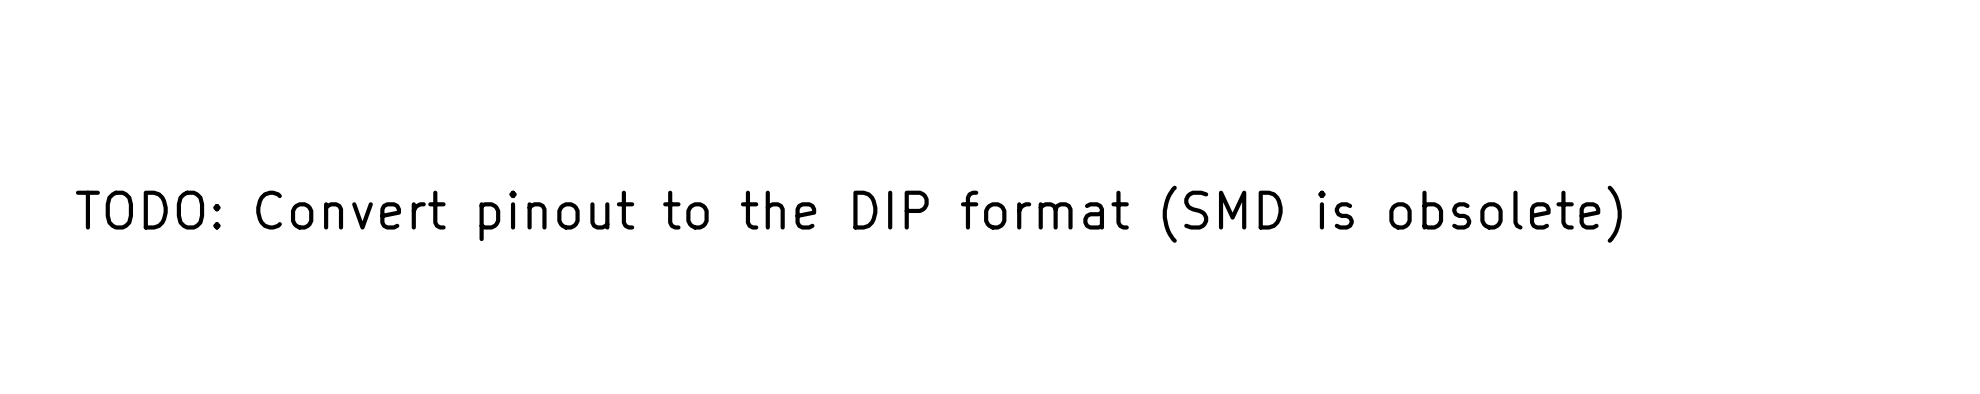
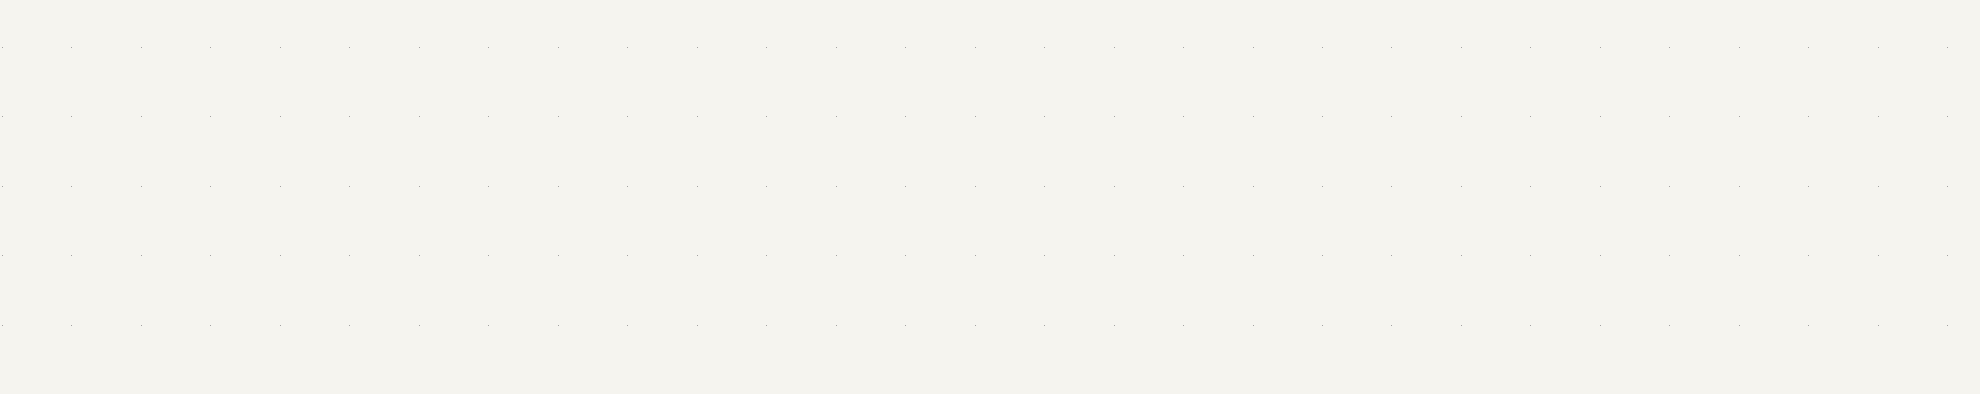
text: TODO: Convert pinout to the DIP format (SMD is obsolete) (848, 214) -> none

